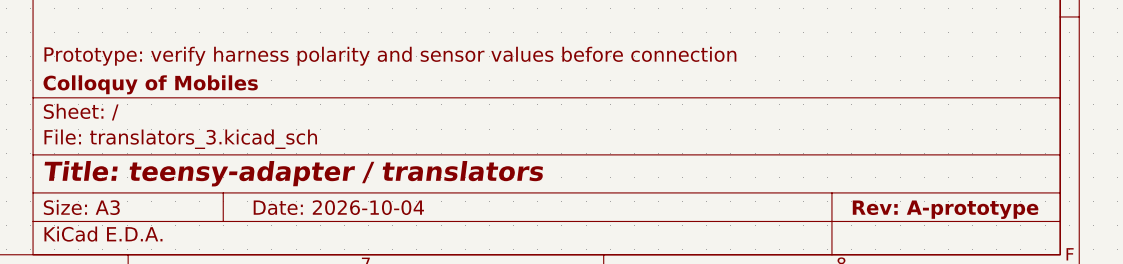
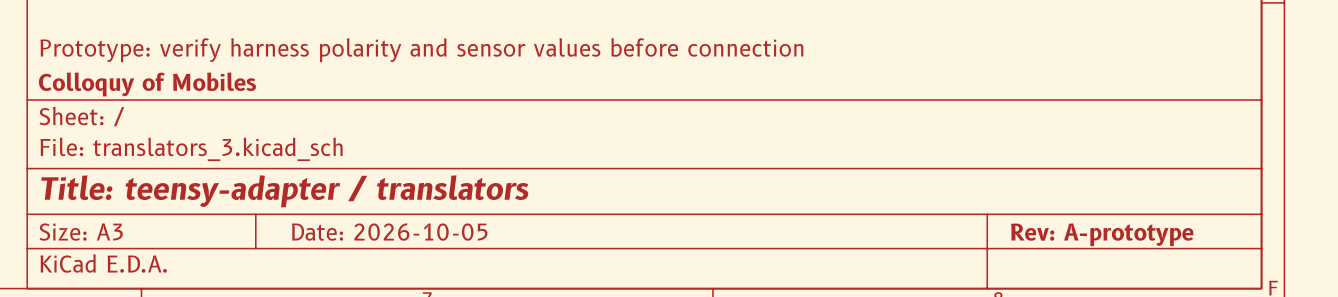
title block: Date: 2026-10-04 (338, 207) -> Date: 2026-10-05 (389, 232)

